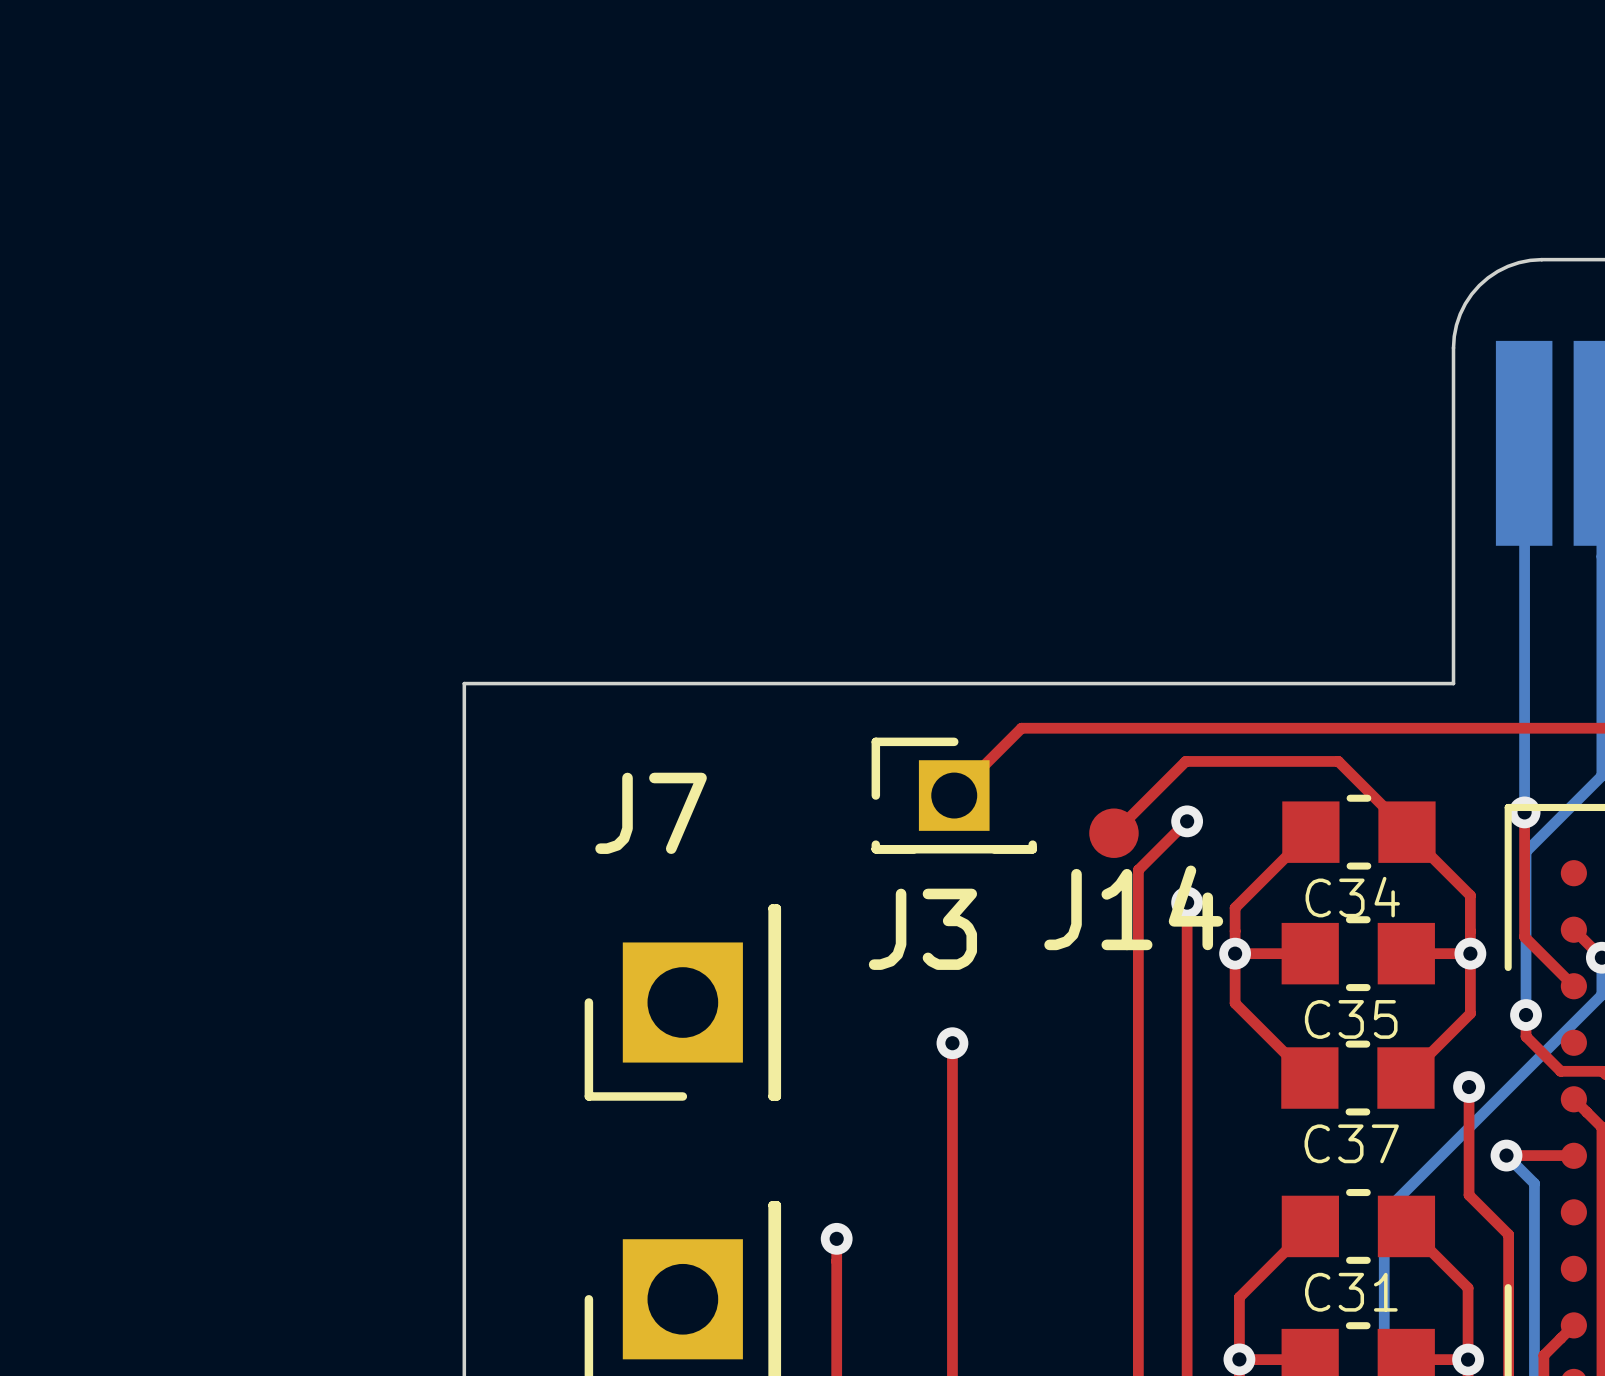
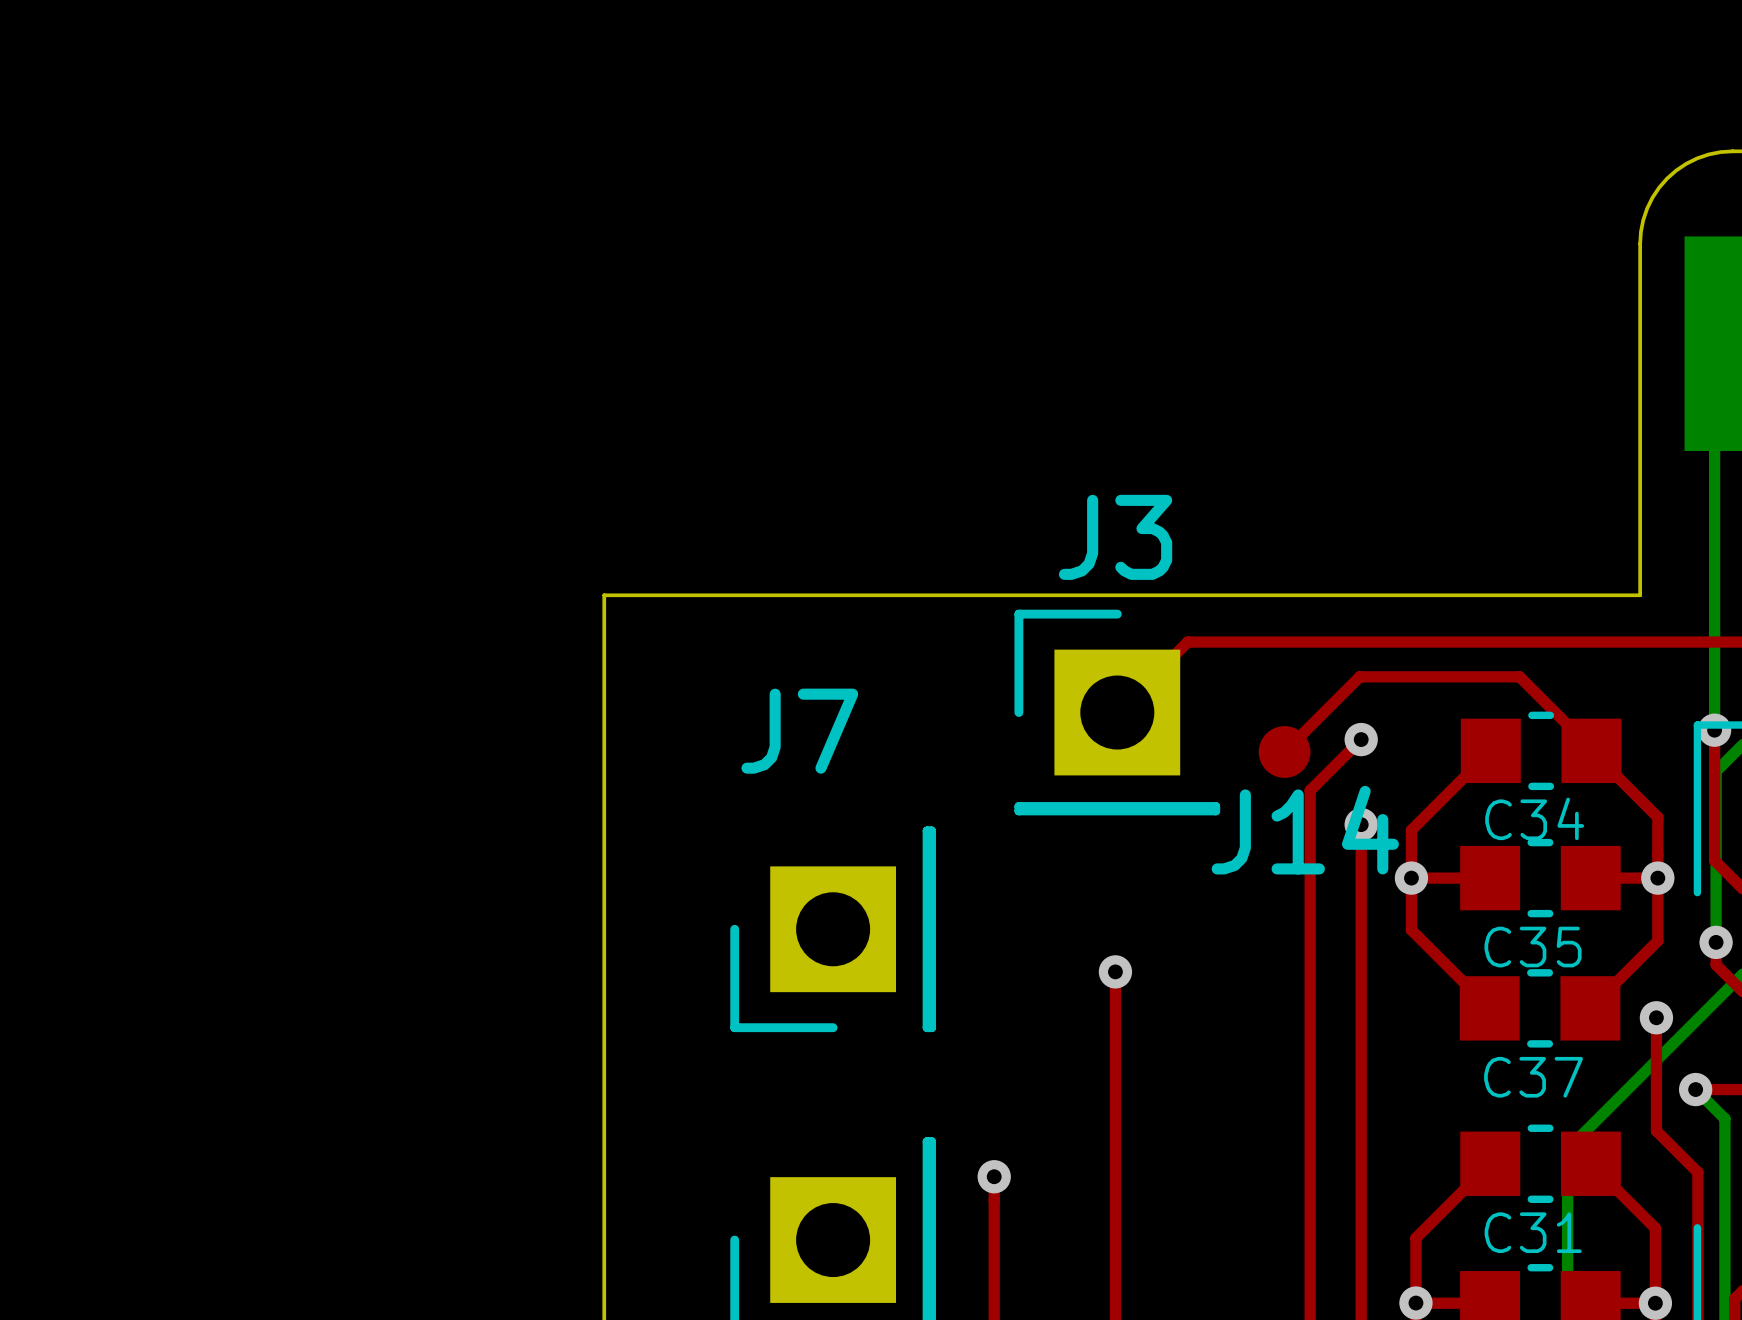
J3 footprint: [871, 737, 1037, 854] -> [1014, 609, 1221, 816]
J3 name position: J3 (922, 929) -> J3 (1115, 537)

